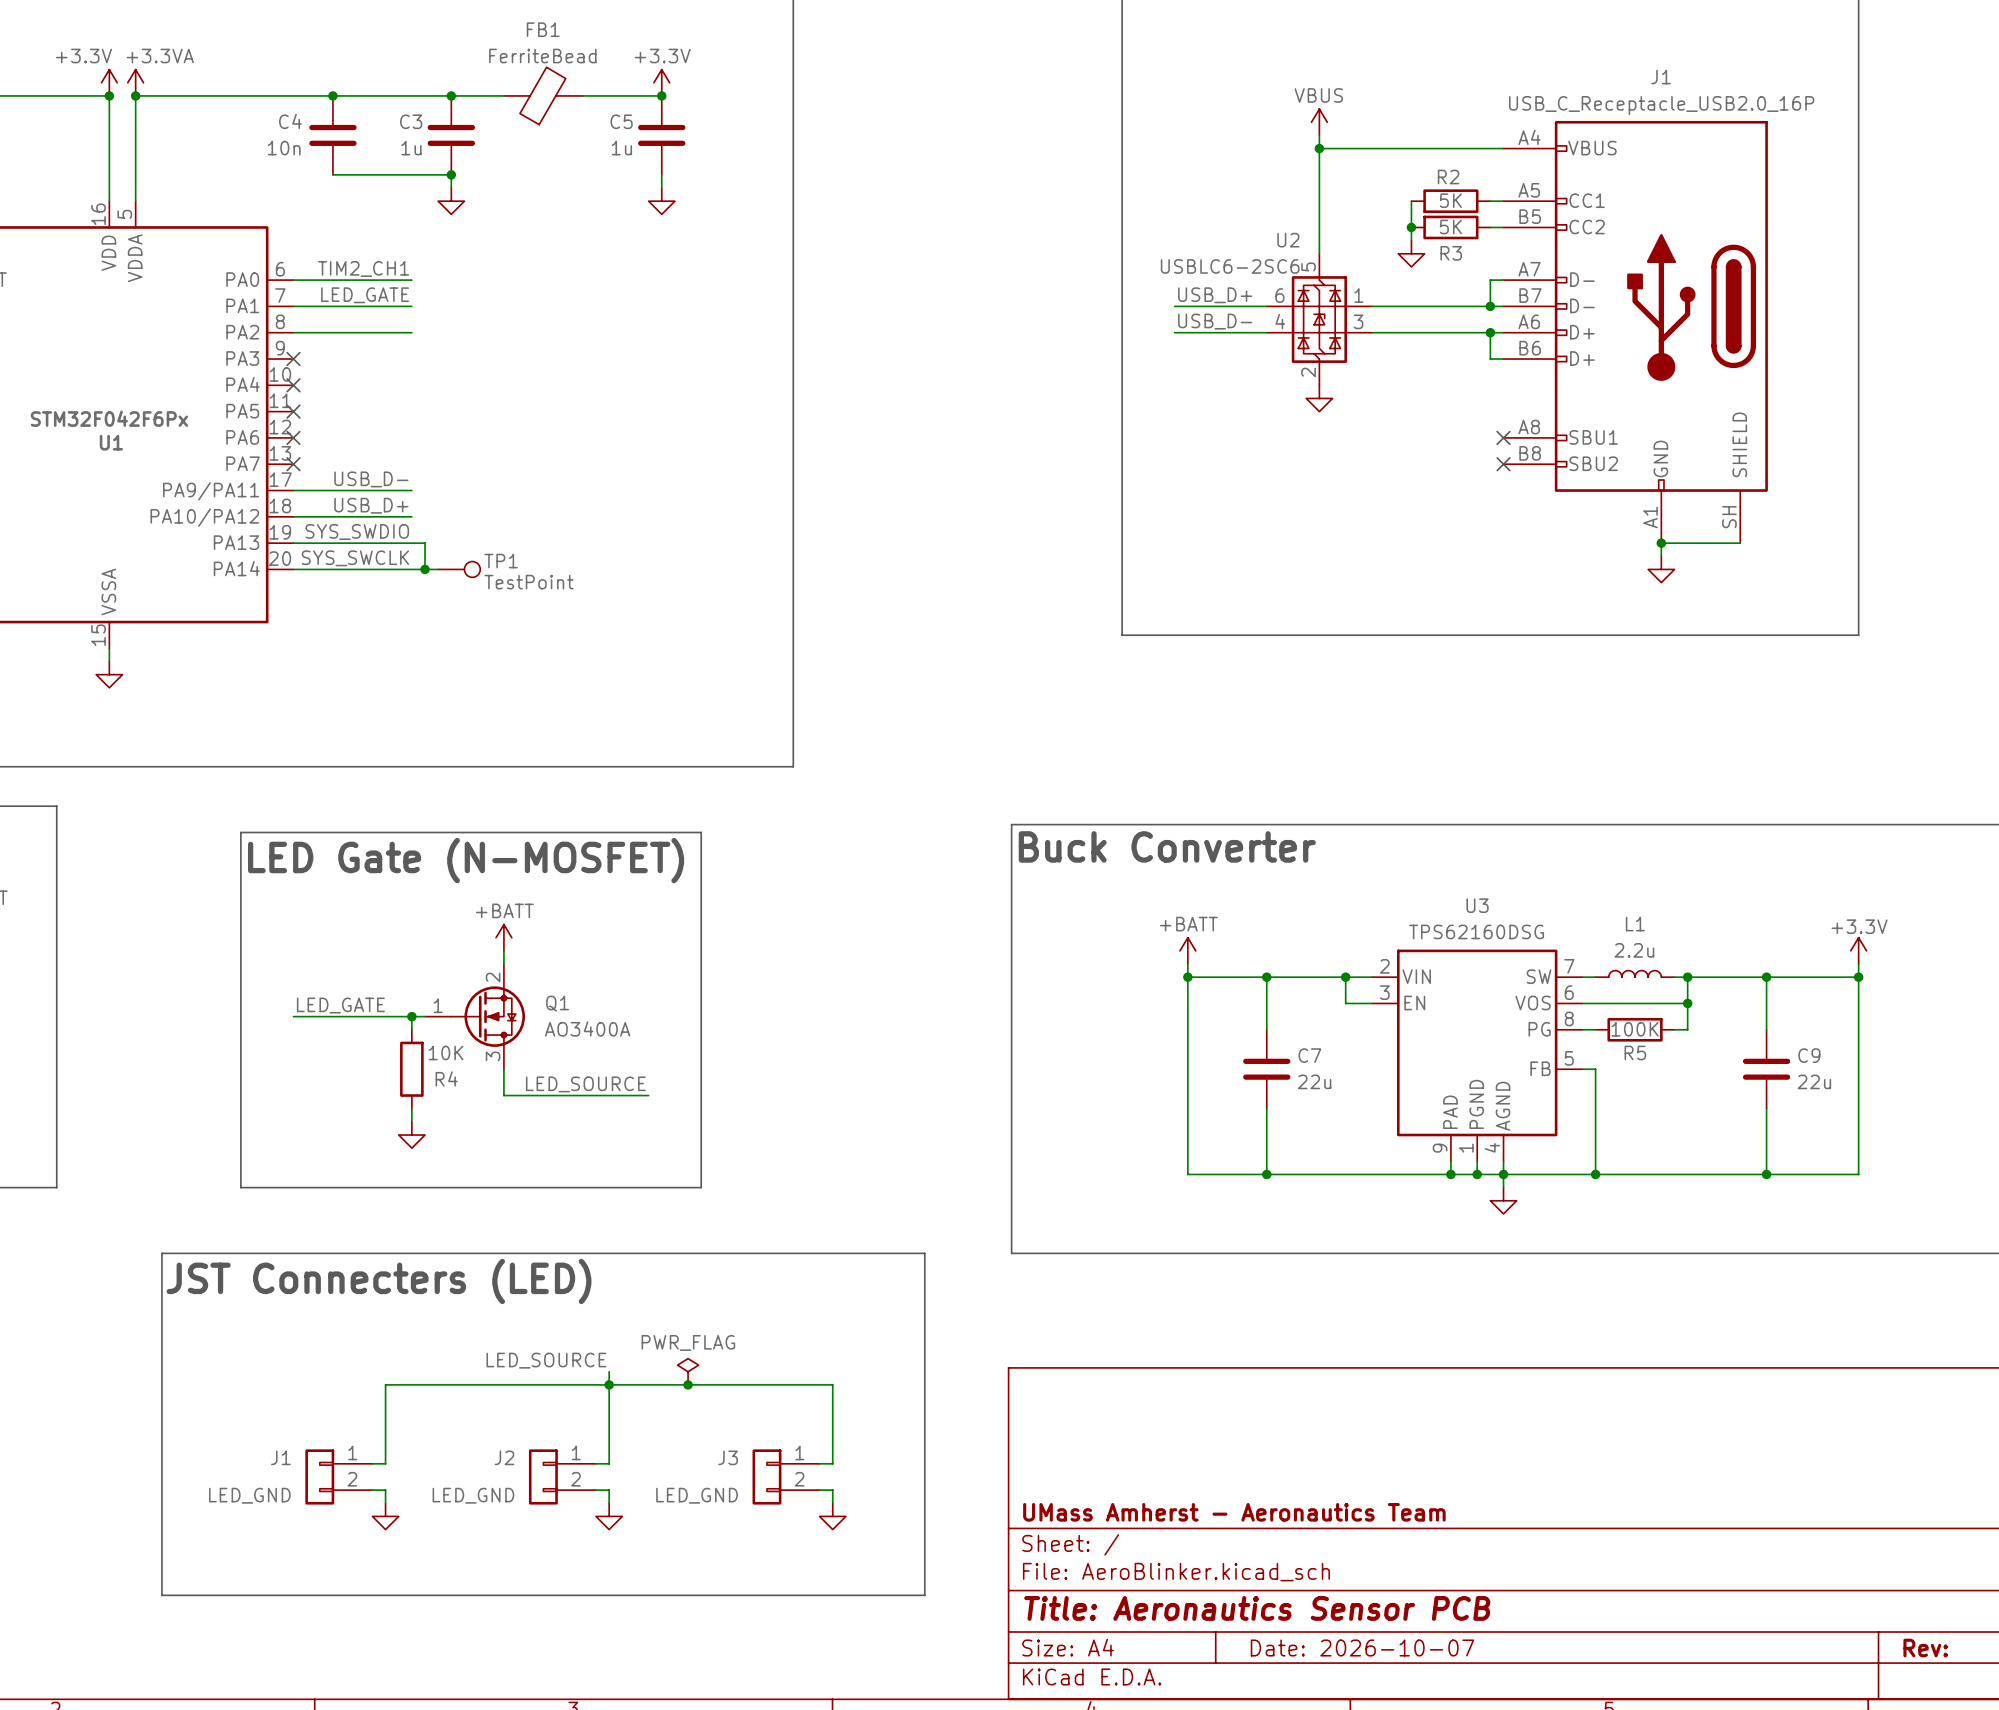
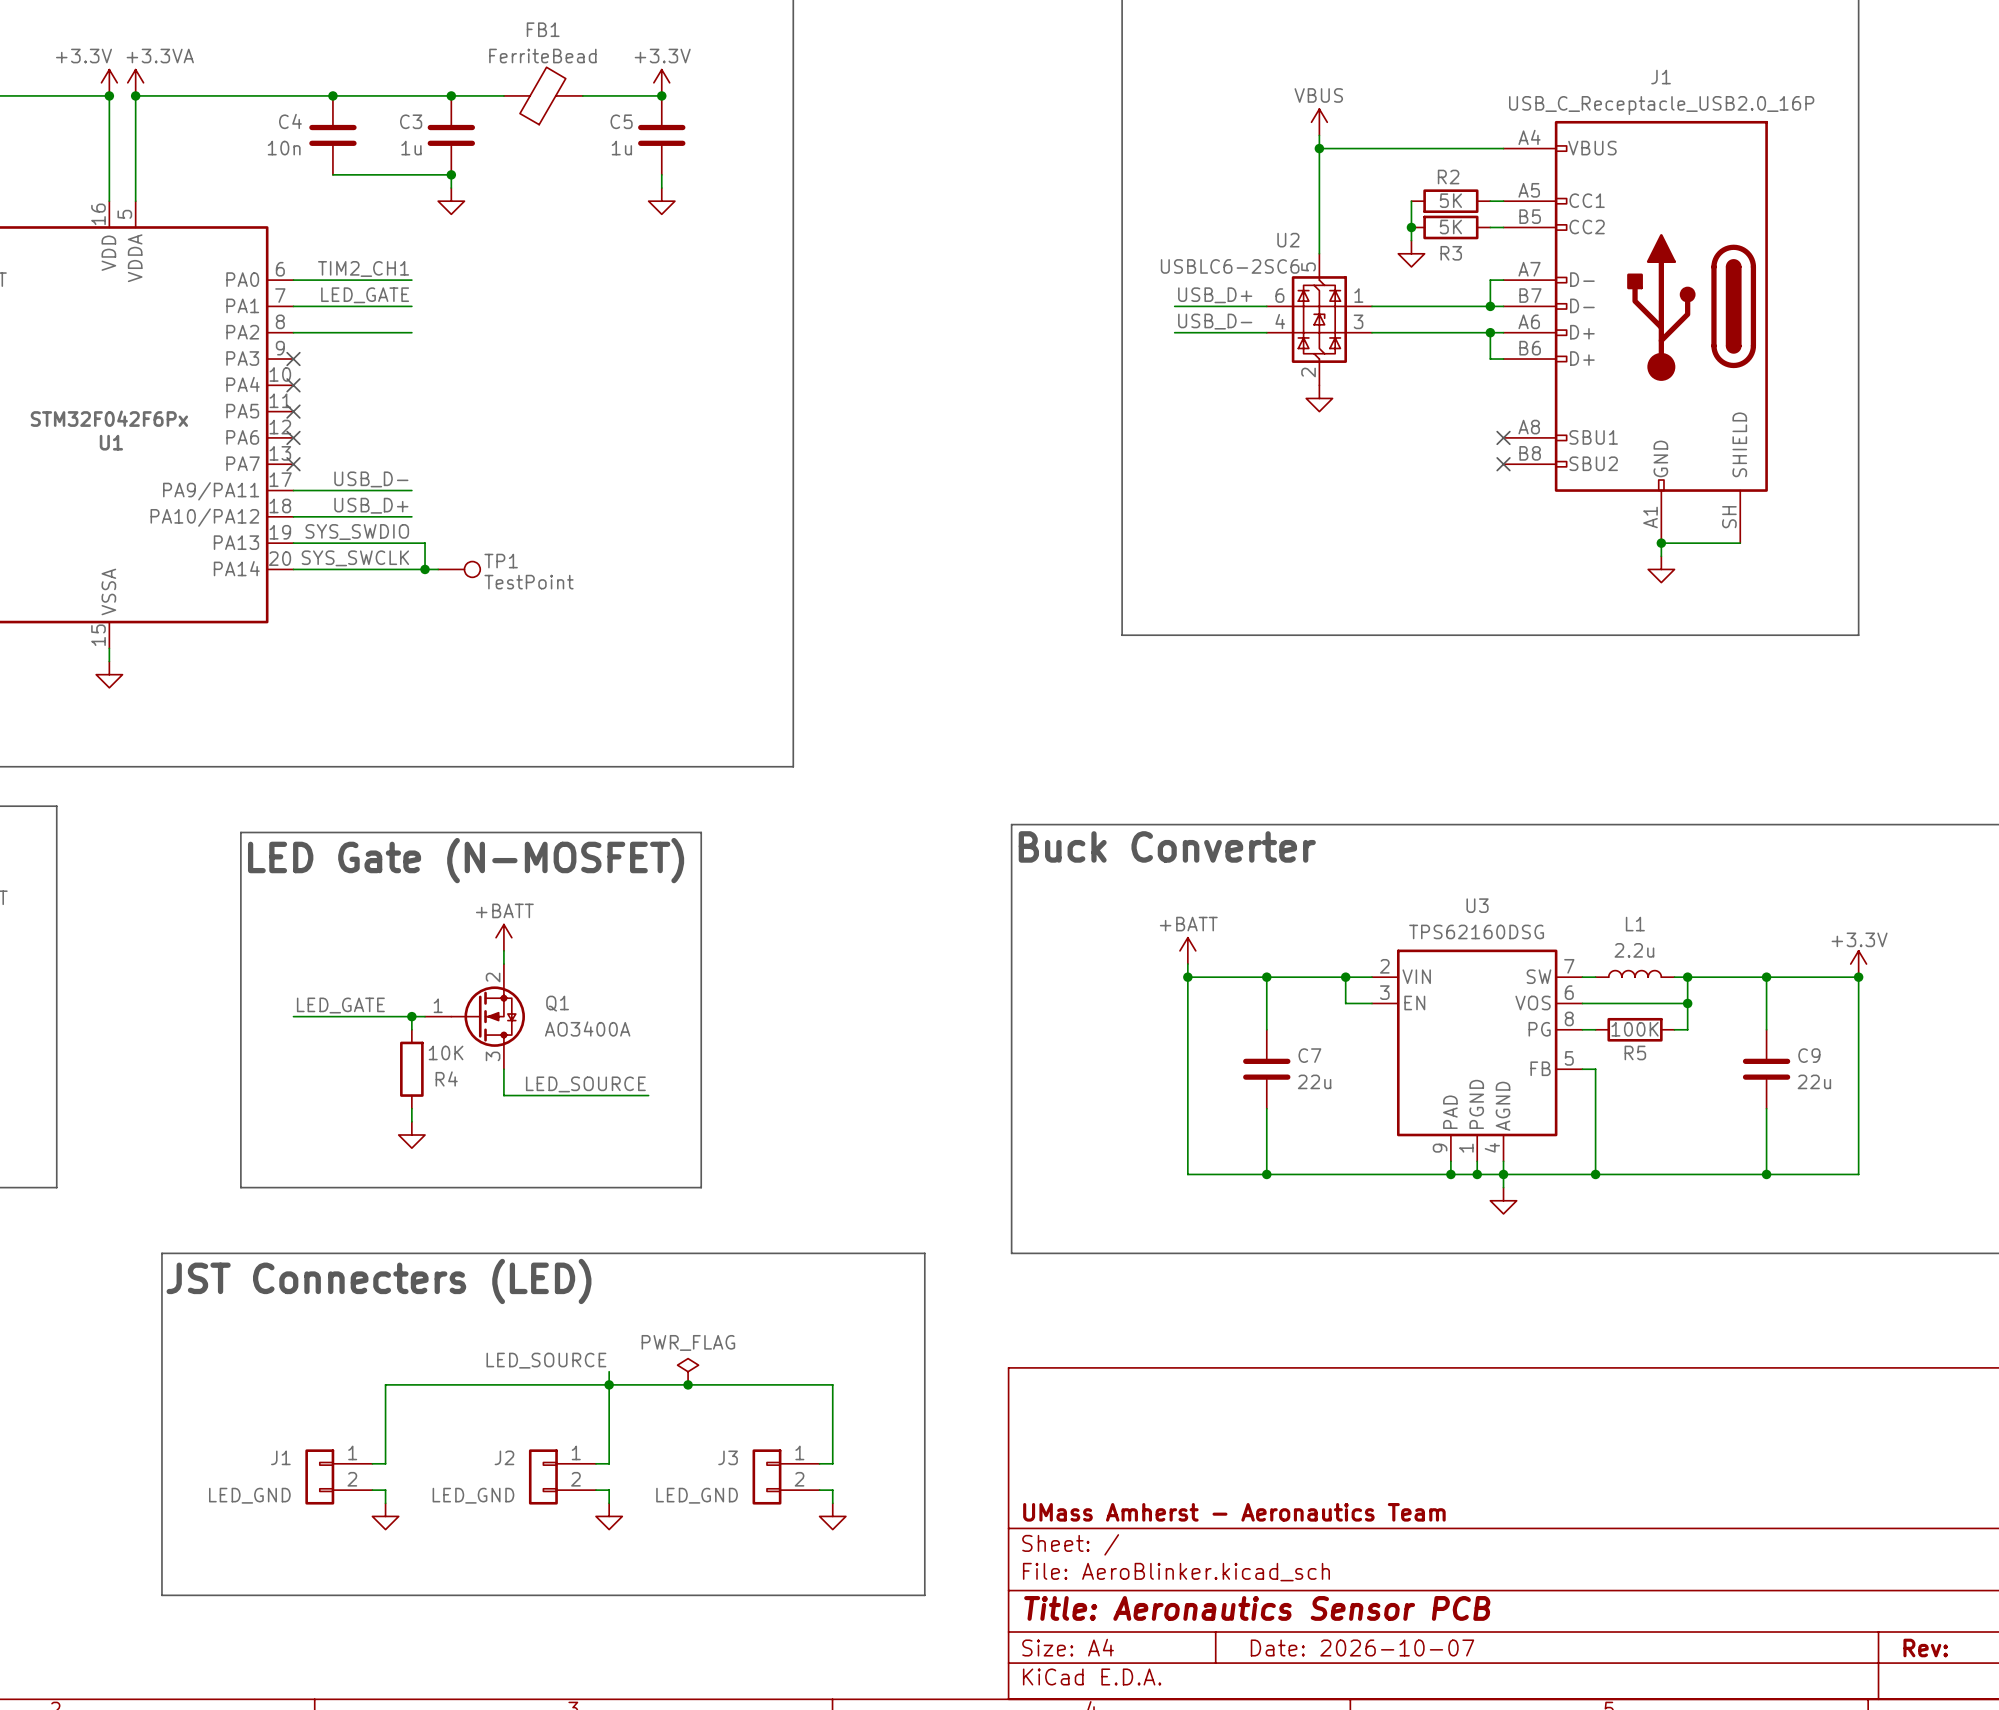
power symbol position: +3.3V (1858, 950) -> +3.3V (1858, 964)

